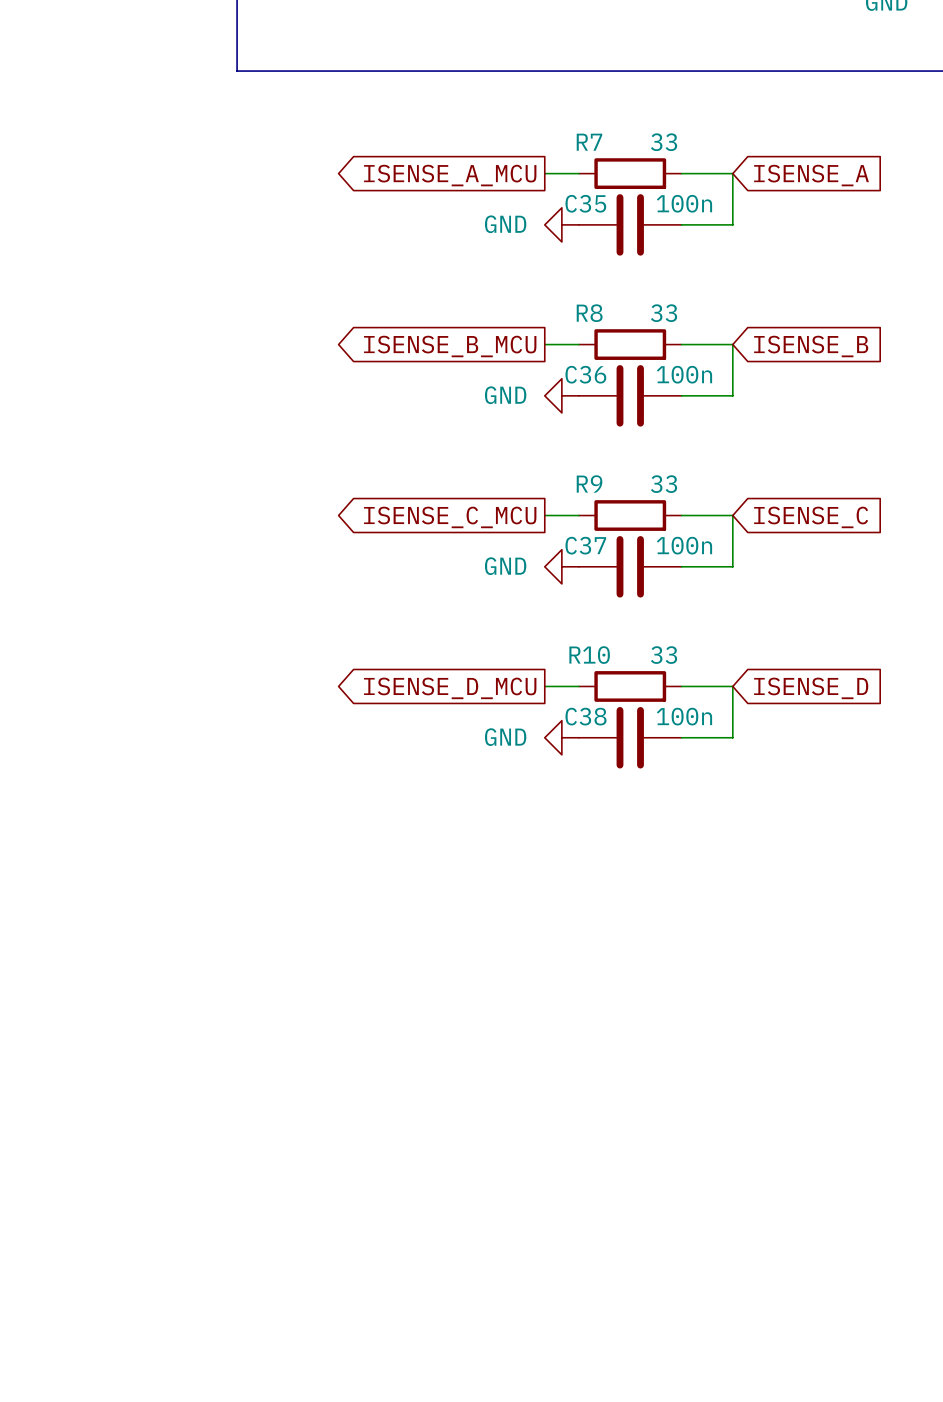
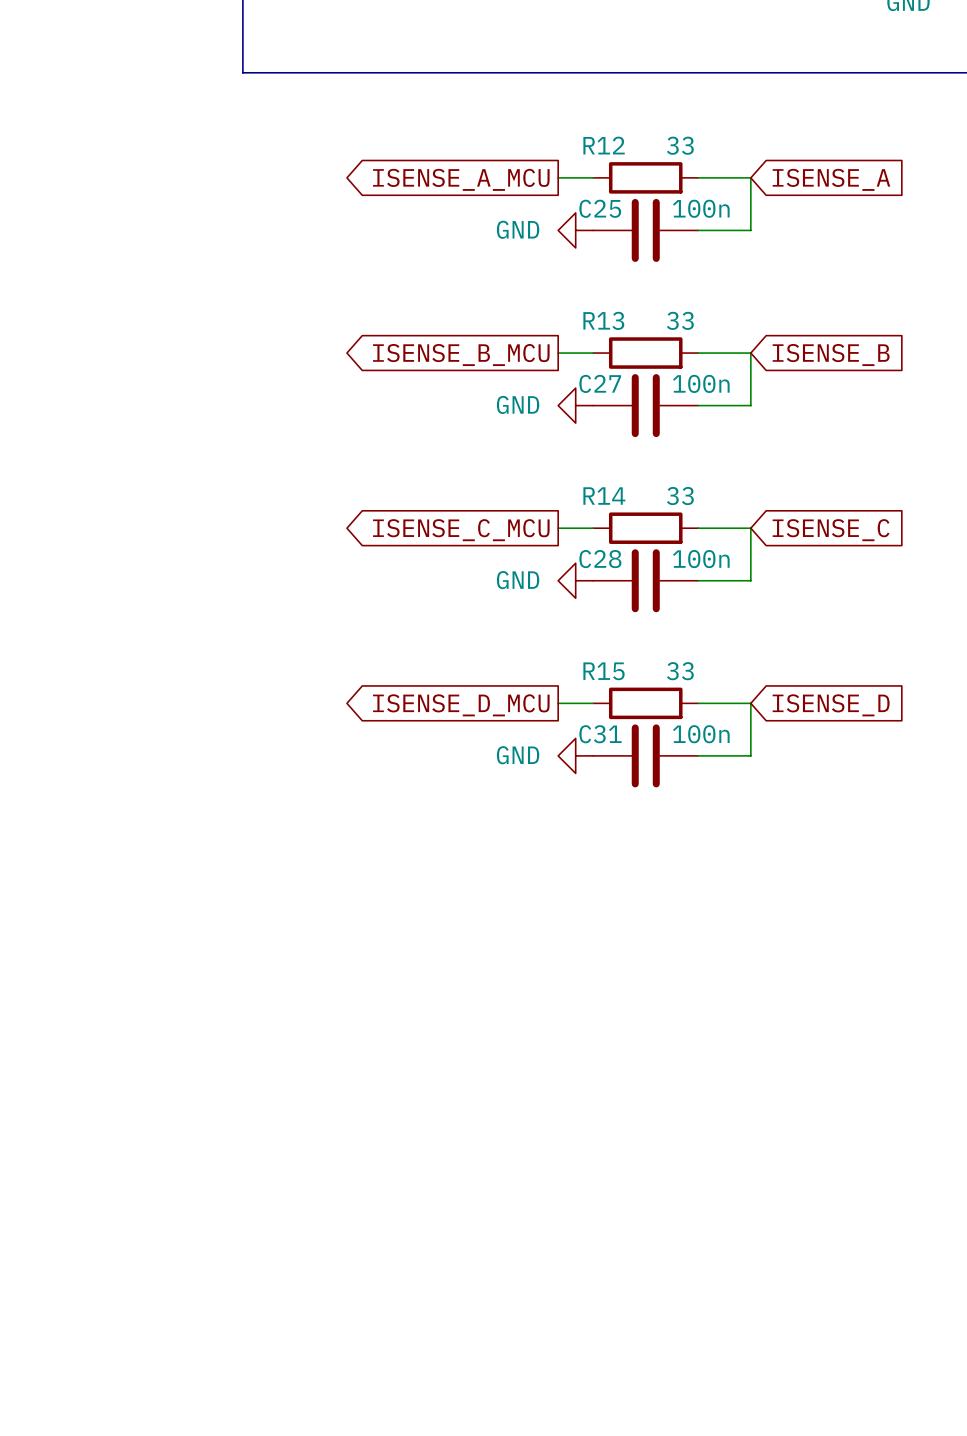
R7 name: R7 (589, 142) -> R12 (604, 145)
C35 name: C35 (585, 203) -> C25 (600, 208)
R8 name: R8 (589, 313) -> R13 (603, 320)
C36 name: C36 (585, 374) -> C27 (600, 383)
R9 name: R9 (589, 483) -> R14 (604, 496)
C37 name: C37 (585, 545) -> C28 (600, 559)
R10 name: R10 (589, 655) -> R15 (604, 671)
C38 name: C38 (585, 716) -> C31 (600, 734)

